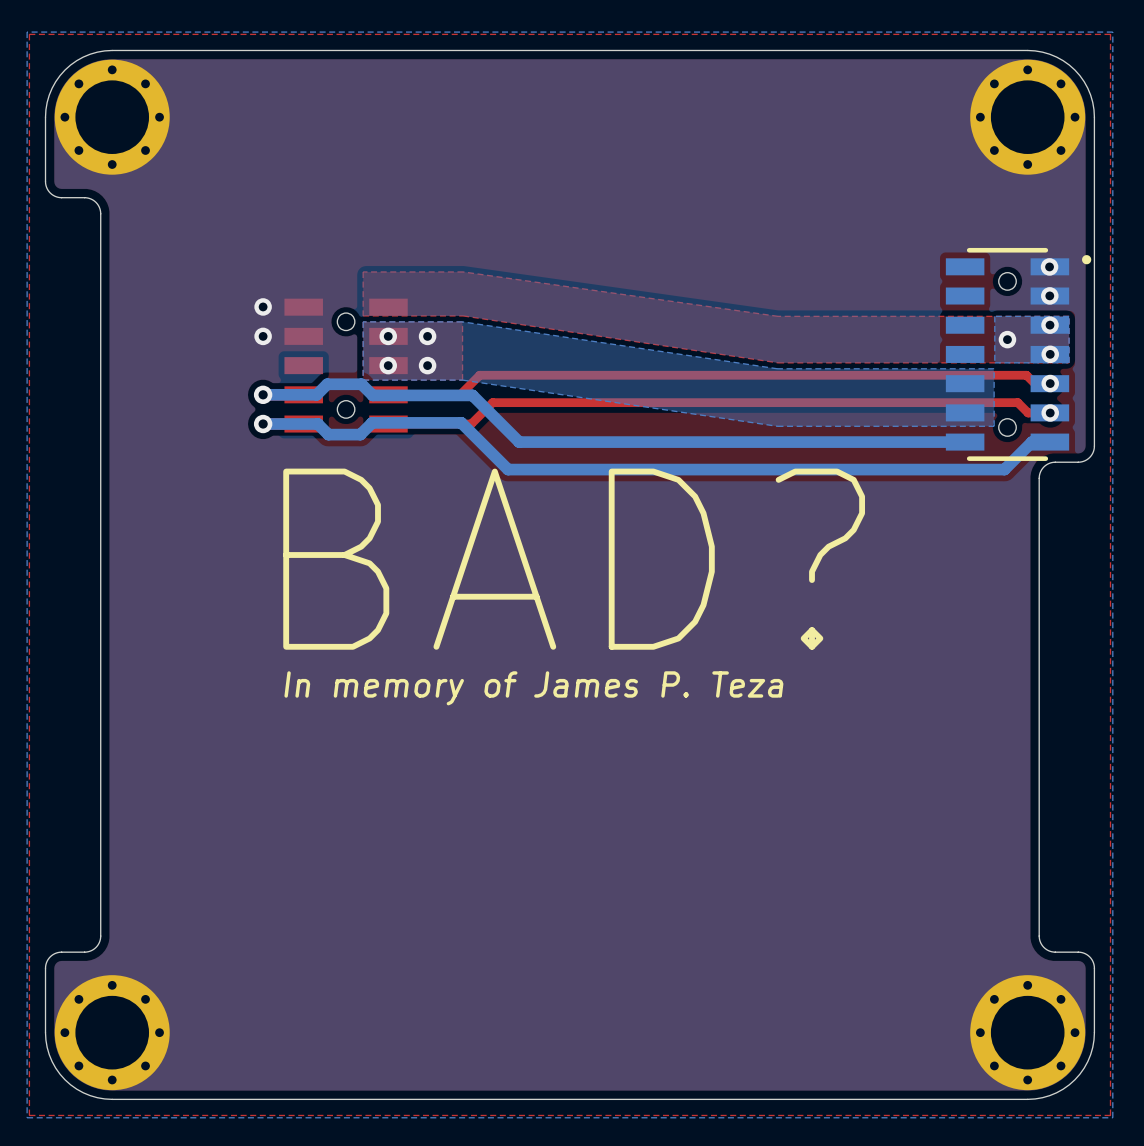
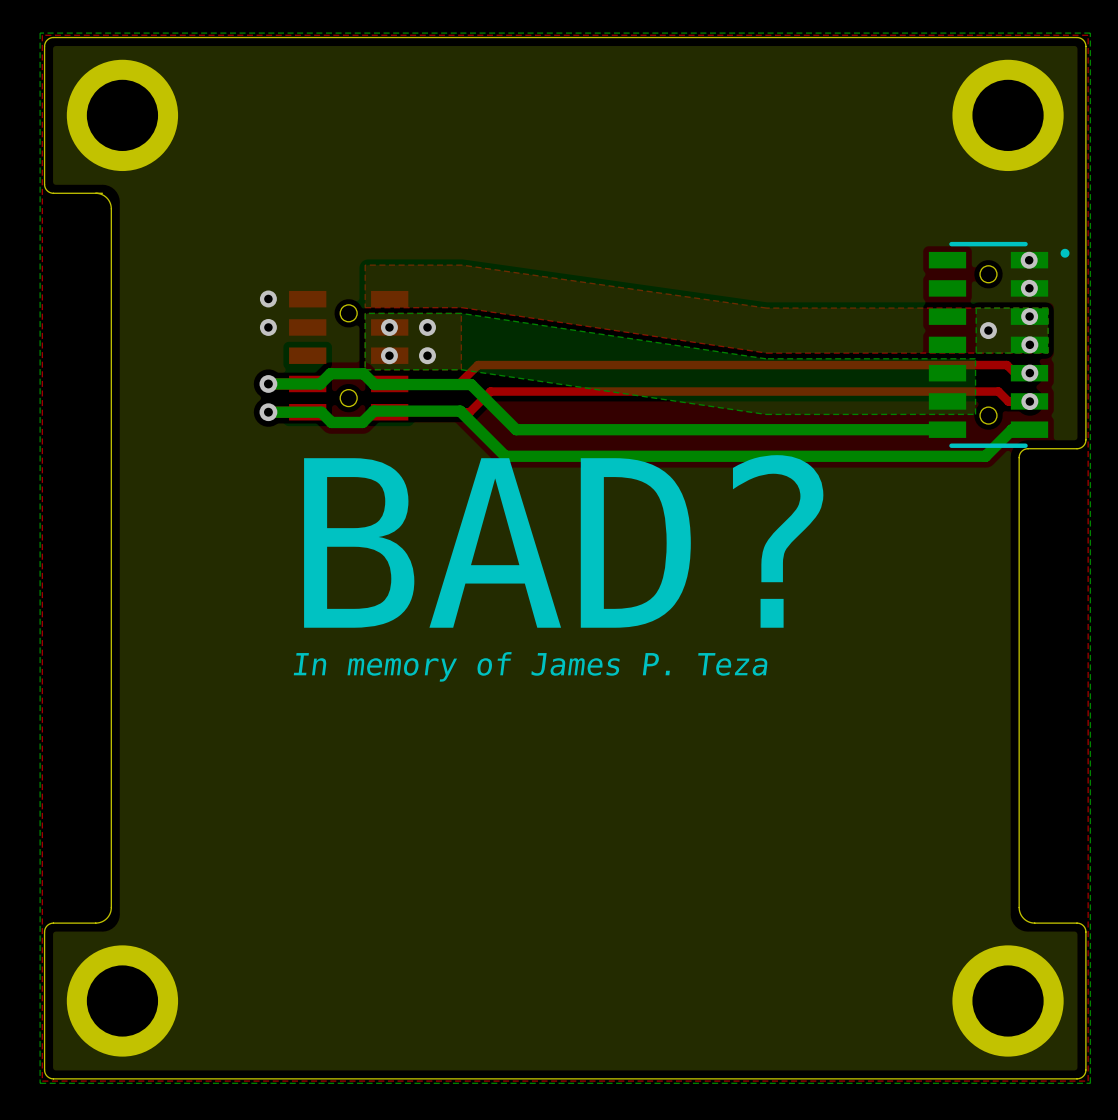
part footprint: [54, 59, 170, 175] -> [66, 59, 179, 172]
part footprint: [970, 59, 1086, 175] -> [952, 59, 1064, 172]
board edge: (61, 197) (50, 192) (45, 183) (45, 117) (49, 95) (55, 81) (70, 65) (83, 57) (104, 50) (1027, 50) (1042, 52) (1063, 60) (1079, 75) (1087, 88) (1093, 109) (1094, 446) (1090, 456) (1083, 461) (1053, 462) (1046, 464) (1041, 469) (1039, 478) -> (73, 193) (51, 192) (44, 185) (44, 46) (46, 40) (52, 37) (1079, 37) (1084, 41) (1085, 46) (1085, 440) (1083, 446) (1078, 448) (1025, 449) (1019, 454) (1019, 464)
board edge: (1078, 952) (1089, 956) (1094, 966) (1094, 1032) (1090, 1054) (1079, 1074) (1063, 1089) (1049, 1095) (1027, 1099) (104, 1098) (83, 1092) (70, 1084) (55, 1068) (49, 1054) (45, 1032) (45, 966) (50, 956) (61, 952) -> (1056, 923) (1078, 923) (1083, 925) (1085, 931) (1085, 1069) (1084, 1075) (1078, 1078) (52, 1078) (46, 1075) (44, 1069) (44, 930) (51, 923) (73, 923)
part footprint: [54, 975, 170, 1091] -> [66, 945, 179, 1057]
part footprint: [970, 975, 1086, 1091] -> [952, 945, 1064, 1057]

